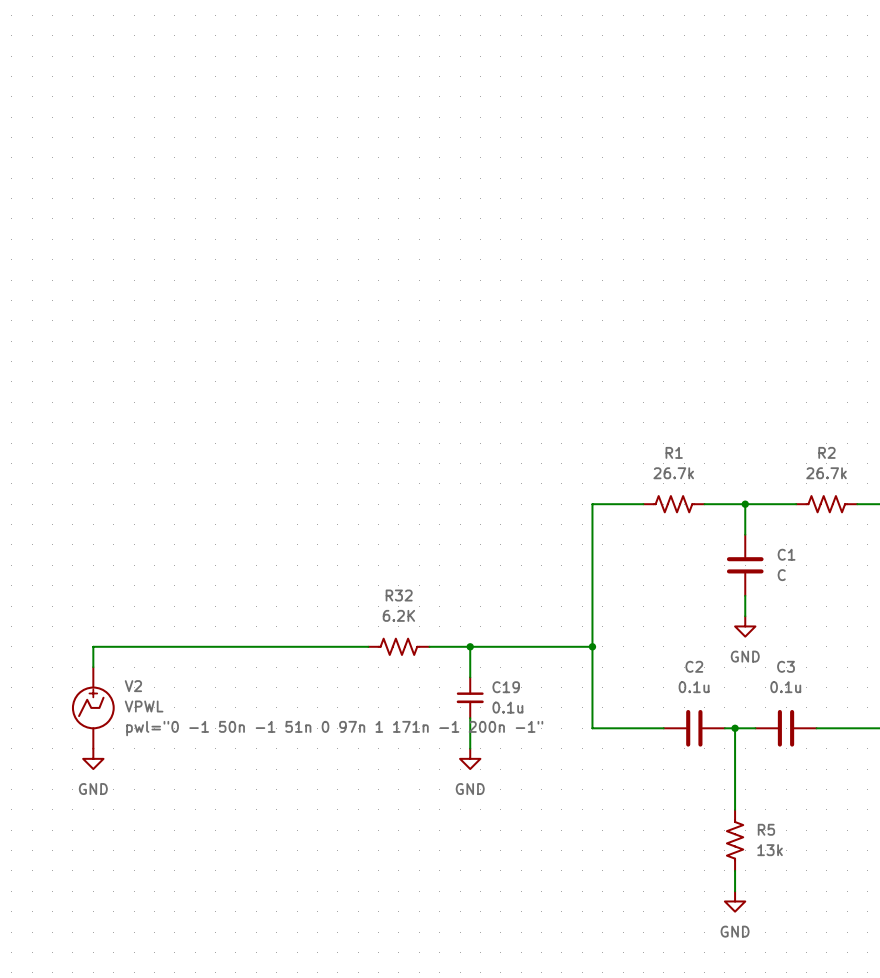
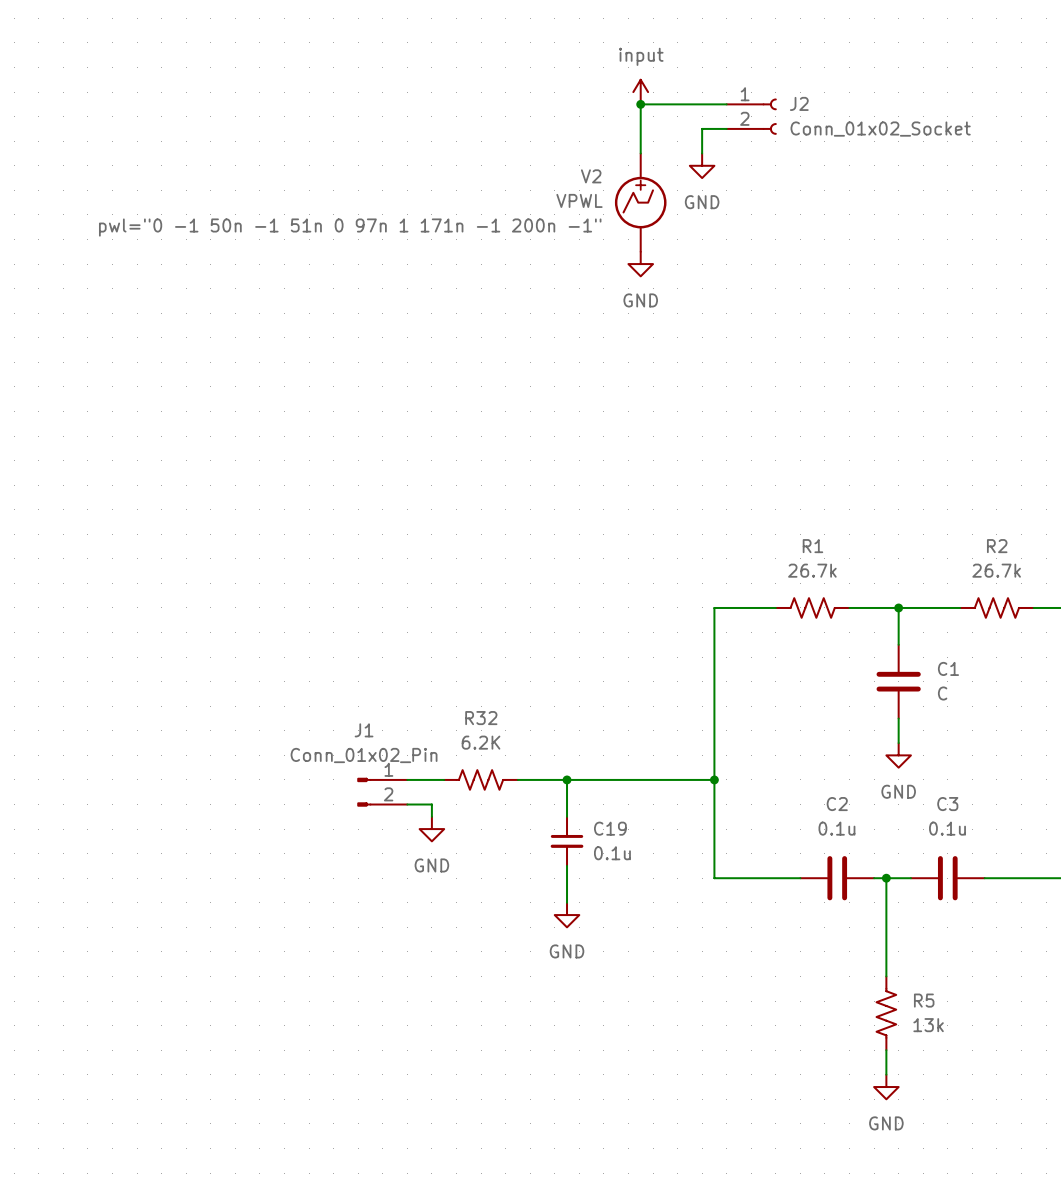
power symbol: none -> input (640, 92)
junction: none -> (640, 104)
wire: none -> (726, 104) (640, 104) (640, 153)
J2: none -> Conn_01x02_Socket (751, 116)
wire: none -> (726, 128) (702, 128) (702, 153)
power symbol: none -> GND (702, 165)
power symbol: none -> GND (640, 264)
wire: (337, 646) (93, 646) (93, 667) -> none
J1: none -> Conn_01x02_Pin (382, 792)
wire: none -> (407, 804) (431, 804) (431, 816)
V2 name position: V2 (133, 686) -> V2 (591, 176)
power symbol: none -> GND (431, 829)
V2 value position: VPWL (144, 706) -> VPWL (579, 200)
V2 position: (93, 707) -> (640, 202)
V2 text position: pwl="0 -1 50n -1 51n 0 97n 1 171n -1 200n -1" (334, 728) -> pwl="0 -1 50n -1 51n 0 97n 1 171n -1 200n -1" (350, 227)
power symbol: GND (93, 758) -> none

